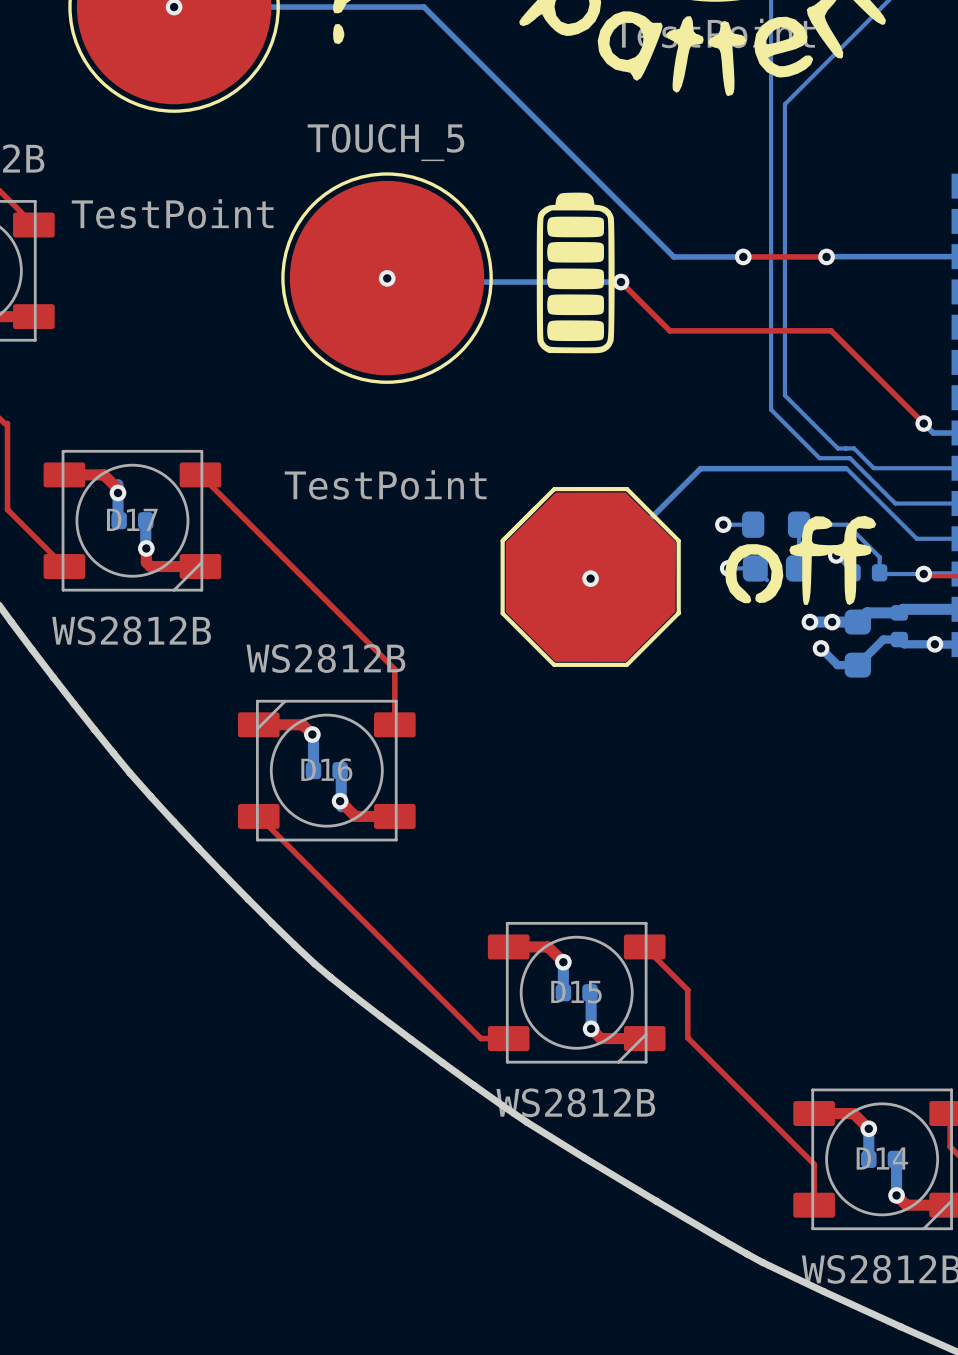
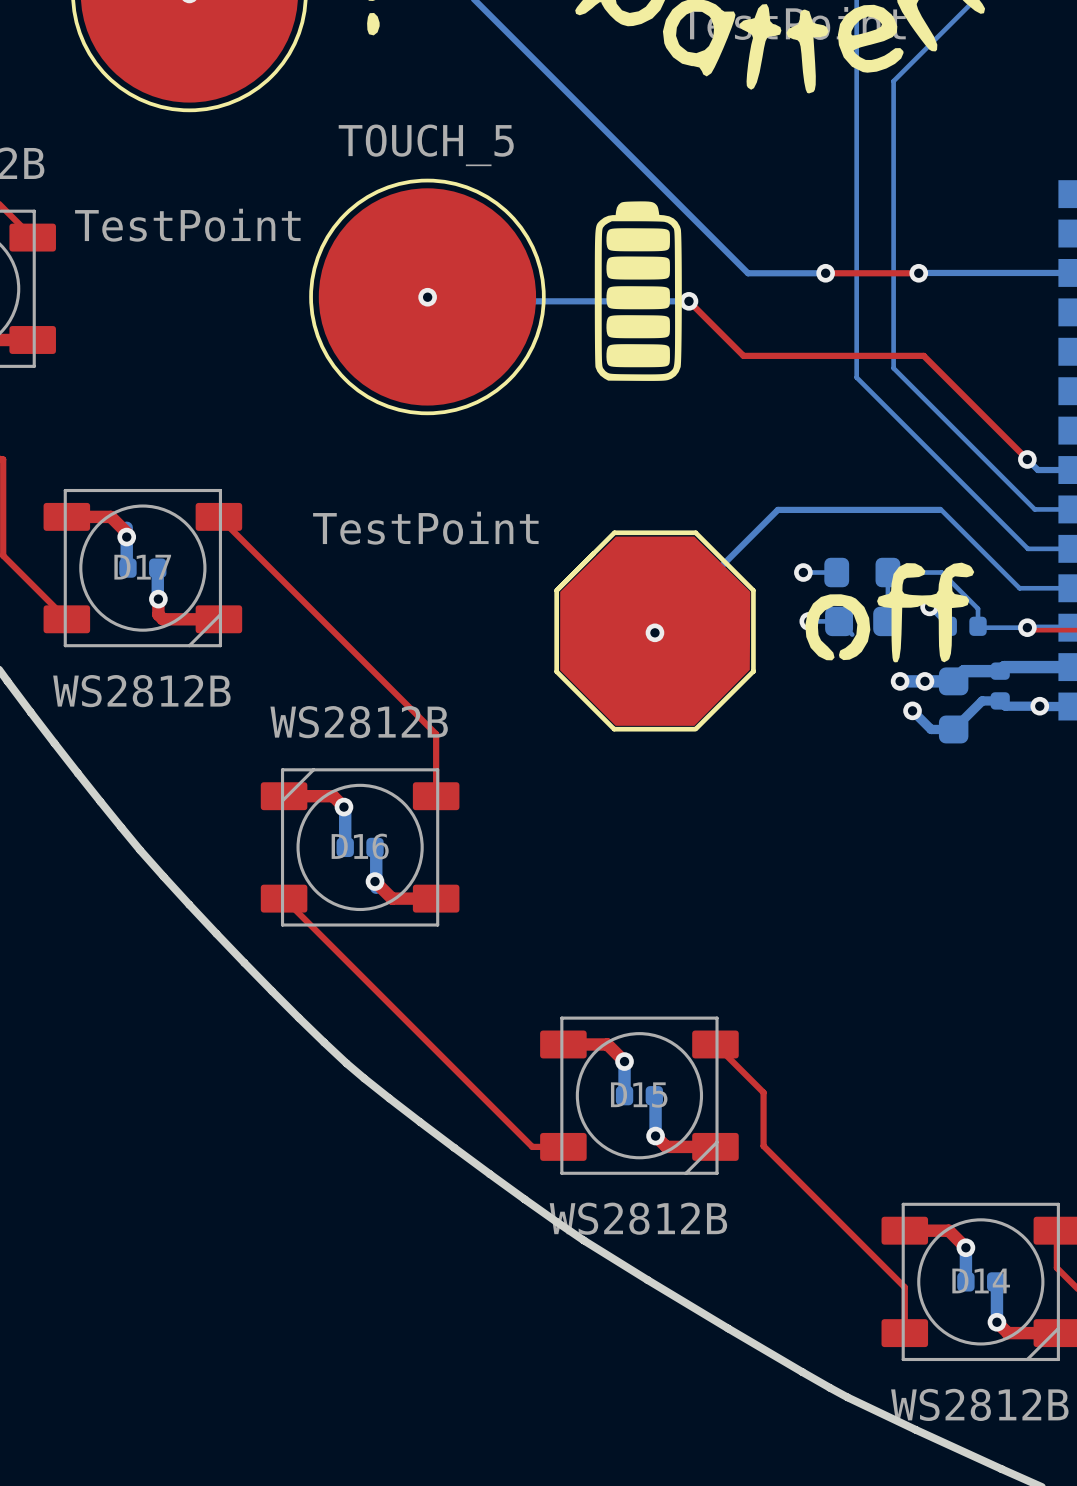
bottom track: (804, 85) (784, 104) (784, 395) (837, 448) (854, 448) (873, 468) (930, 468) -> (893, 81) (893, 368) (1034, 509)
bottom track: (771, 350) (771, 409) (819, 458) (850, 458) (895, 503) (924, 503) -> (856, 377) (1027, 548)

